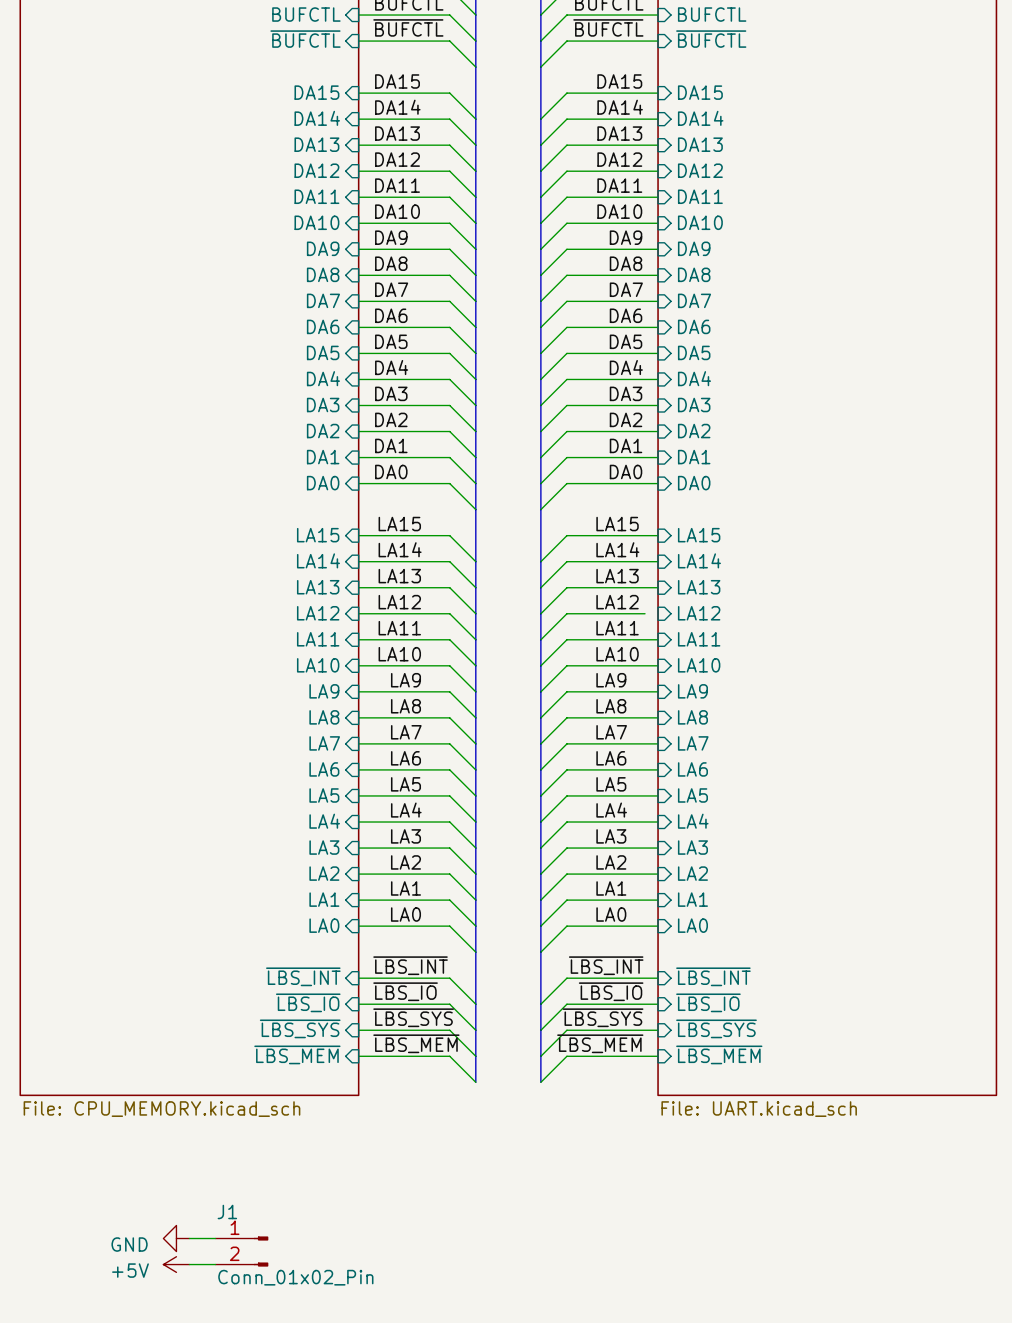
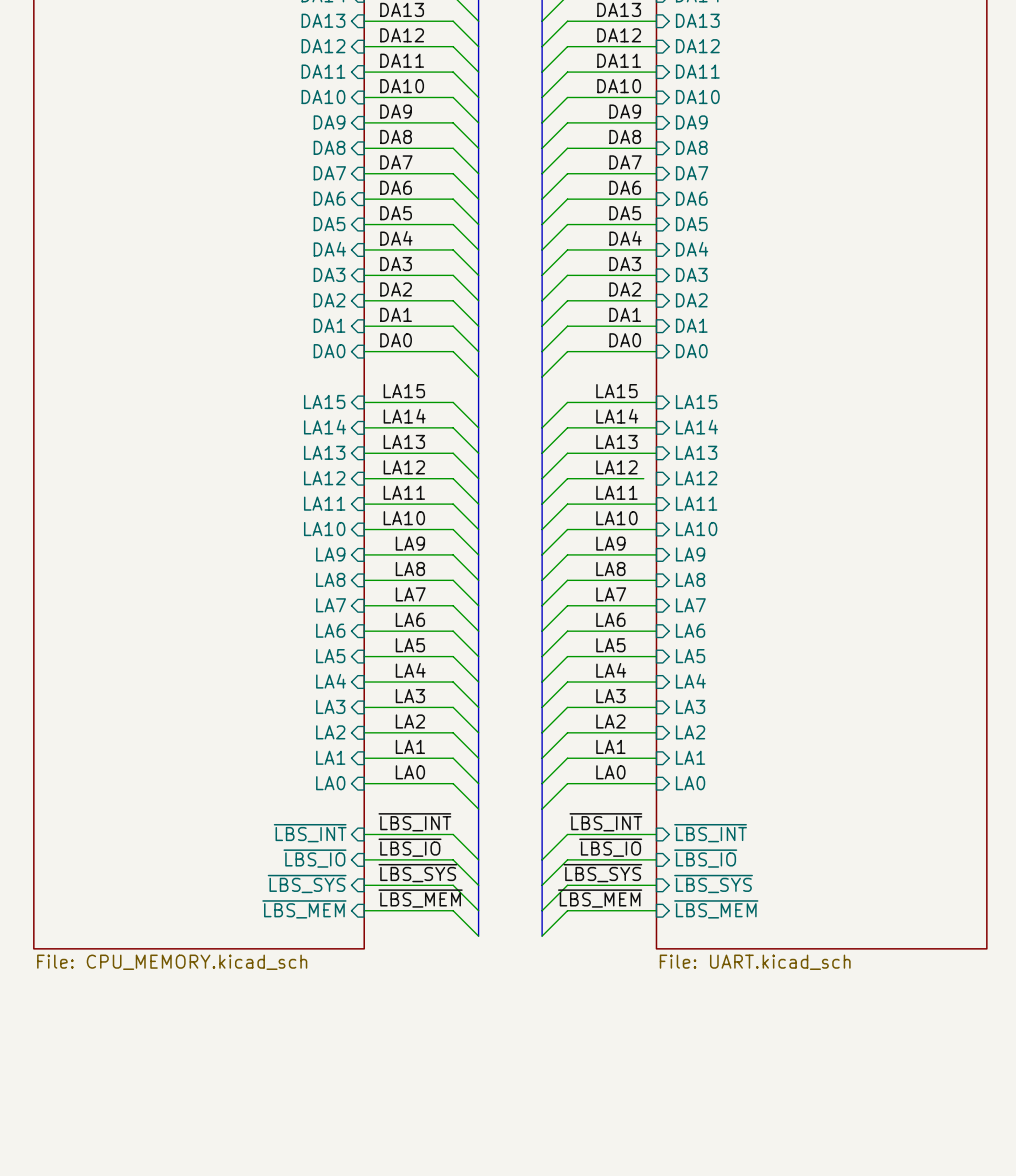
power symbol: GND (176, 1238) -> none
wire: (189, 1238) (215, 1238) -> none
J1: Conn_01x02_Pin (241, 1251) -> none
power symbol: +5V (176, 1264) -> none
wire: (189, 1264) (215, 1264) -> none

